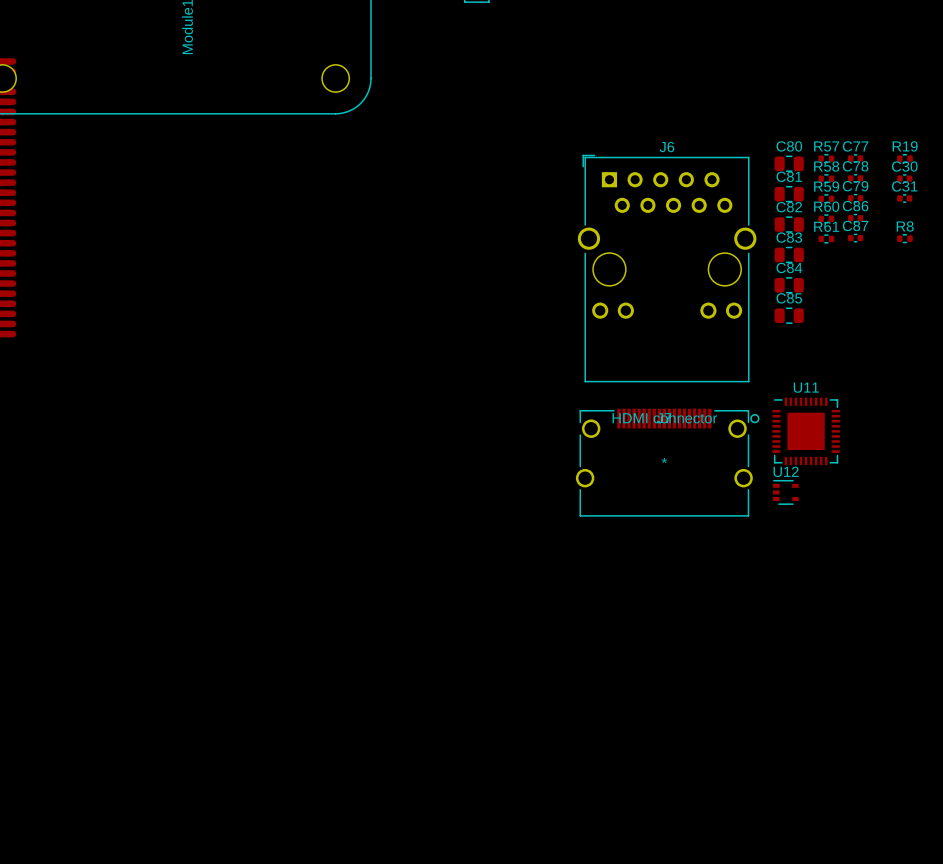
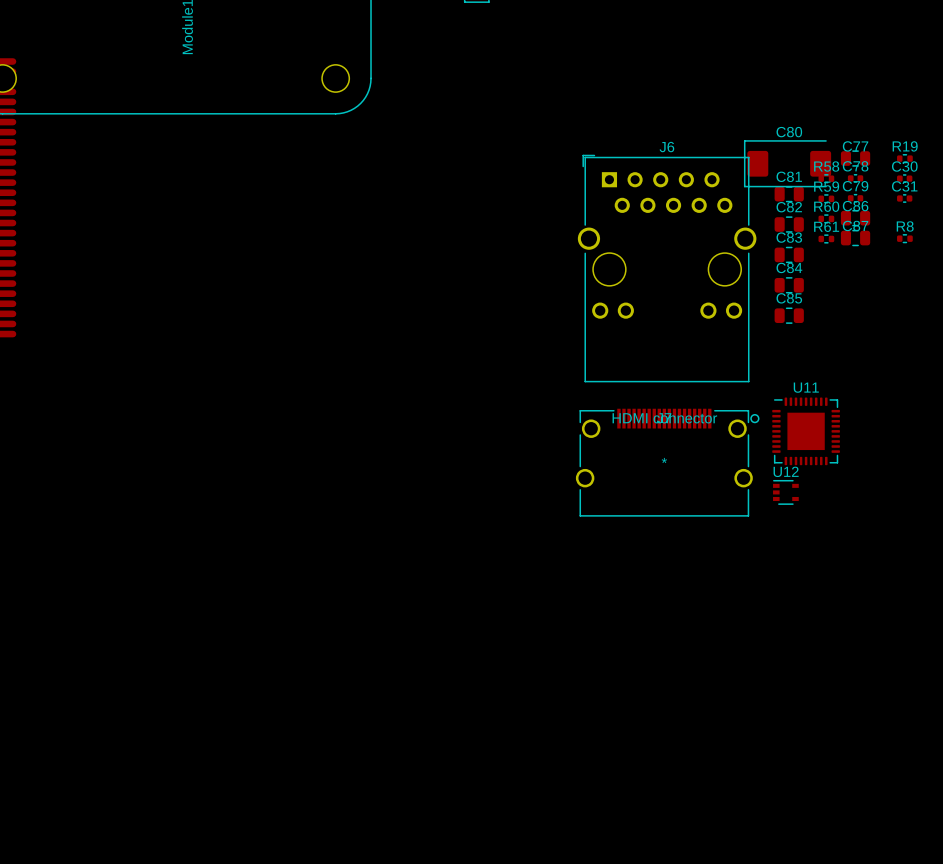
C77 footprint: [847, 154, 864, 163] -> [840, 150, 871, 167]
C80 footprint: [774, 155, 804, 172] -> [744, 140, 832, 188]
R57: (826, 158) -> none
C86 footprint: [847, 213, 864, 223] -> [840, 210, 871, 227]
C87 footprint: [847, 233, 864, 243] -> [840, 230, 871, 247]

